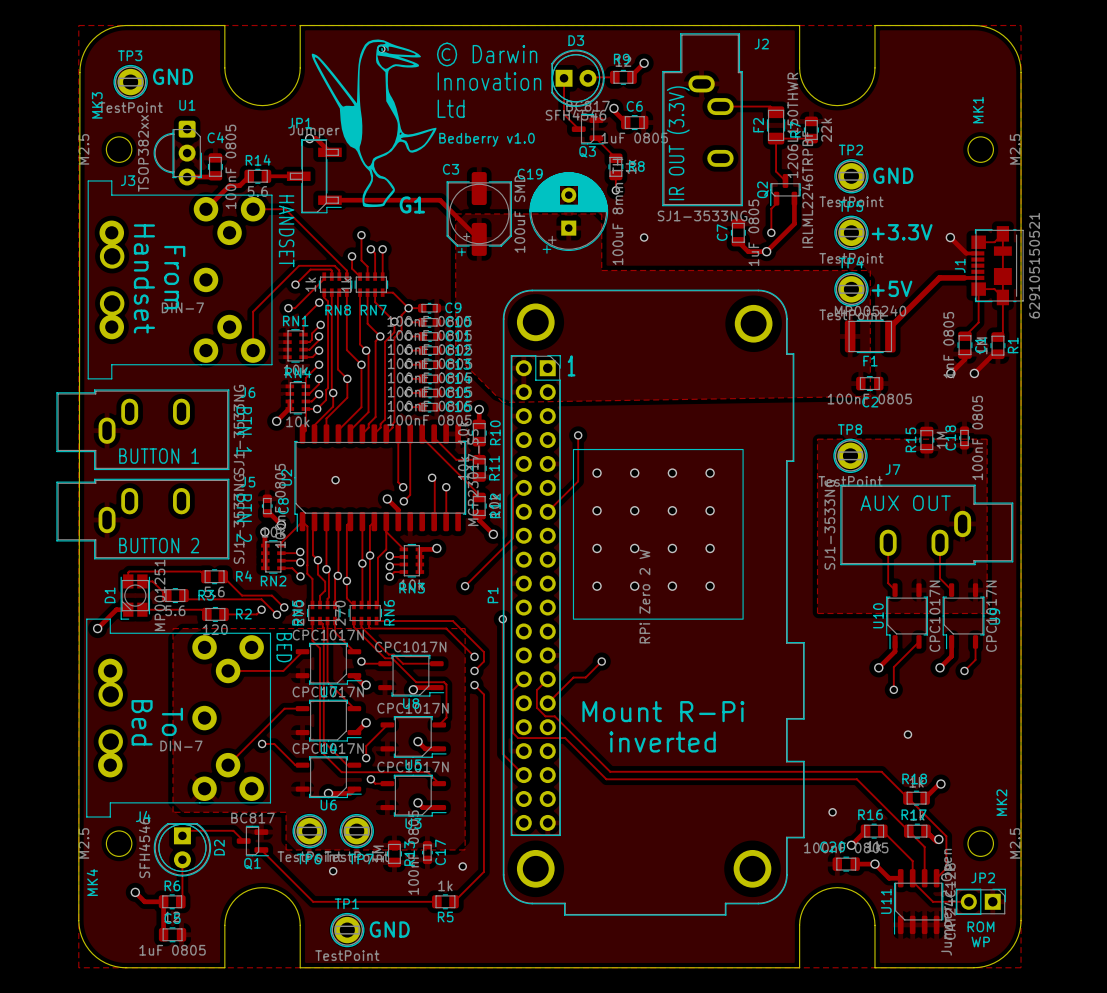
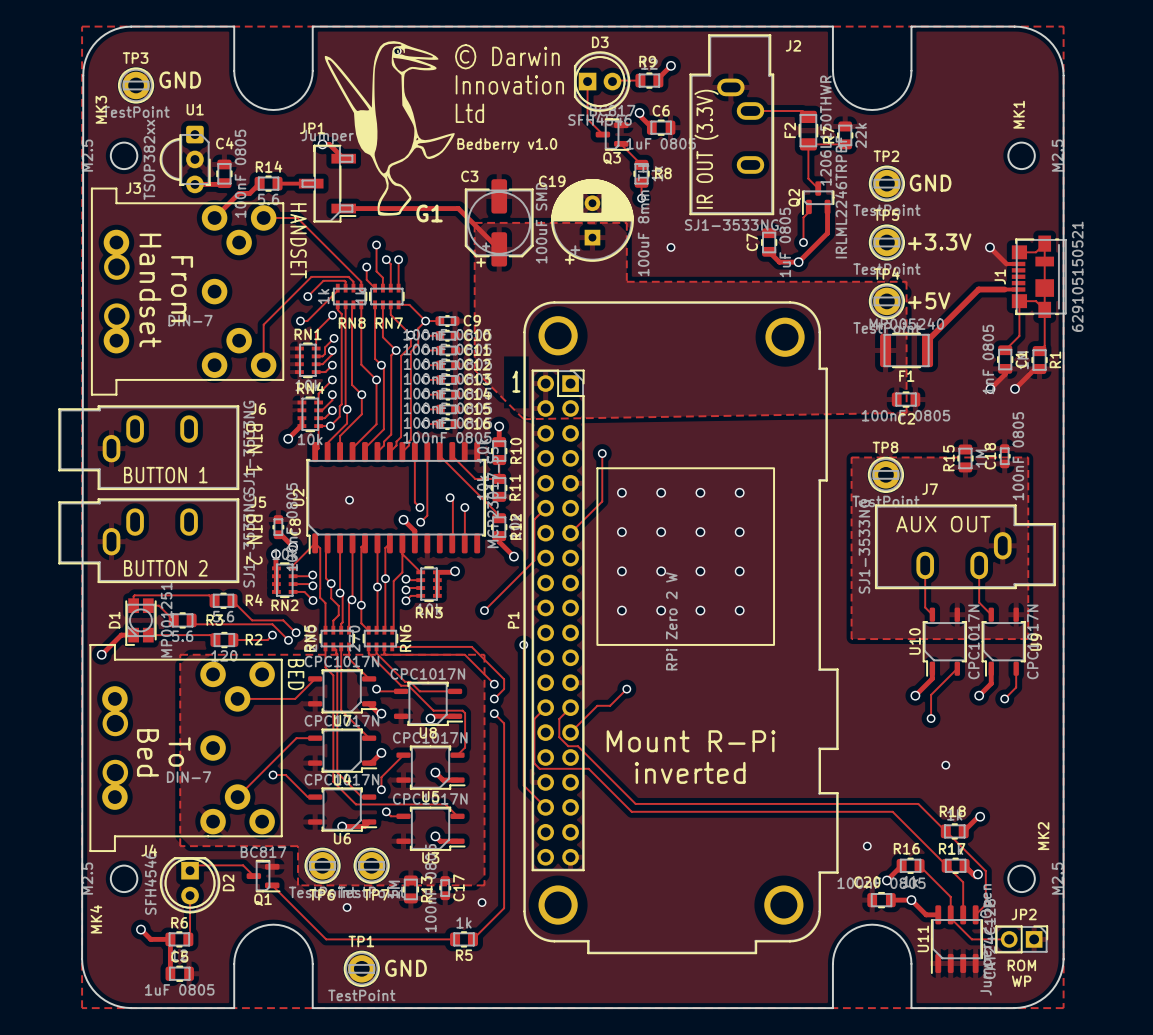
text position: 1 (571, 365) -> 1 (516, 381)

